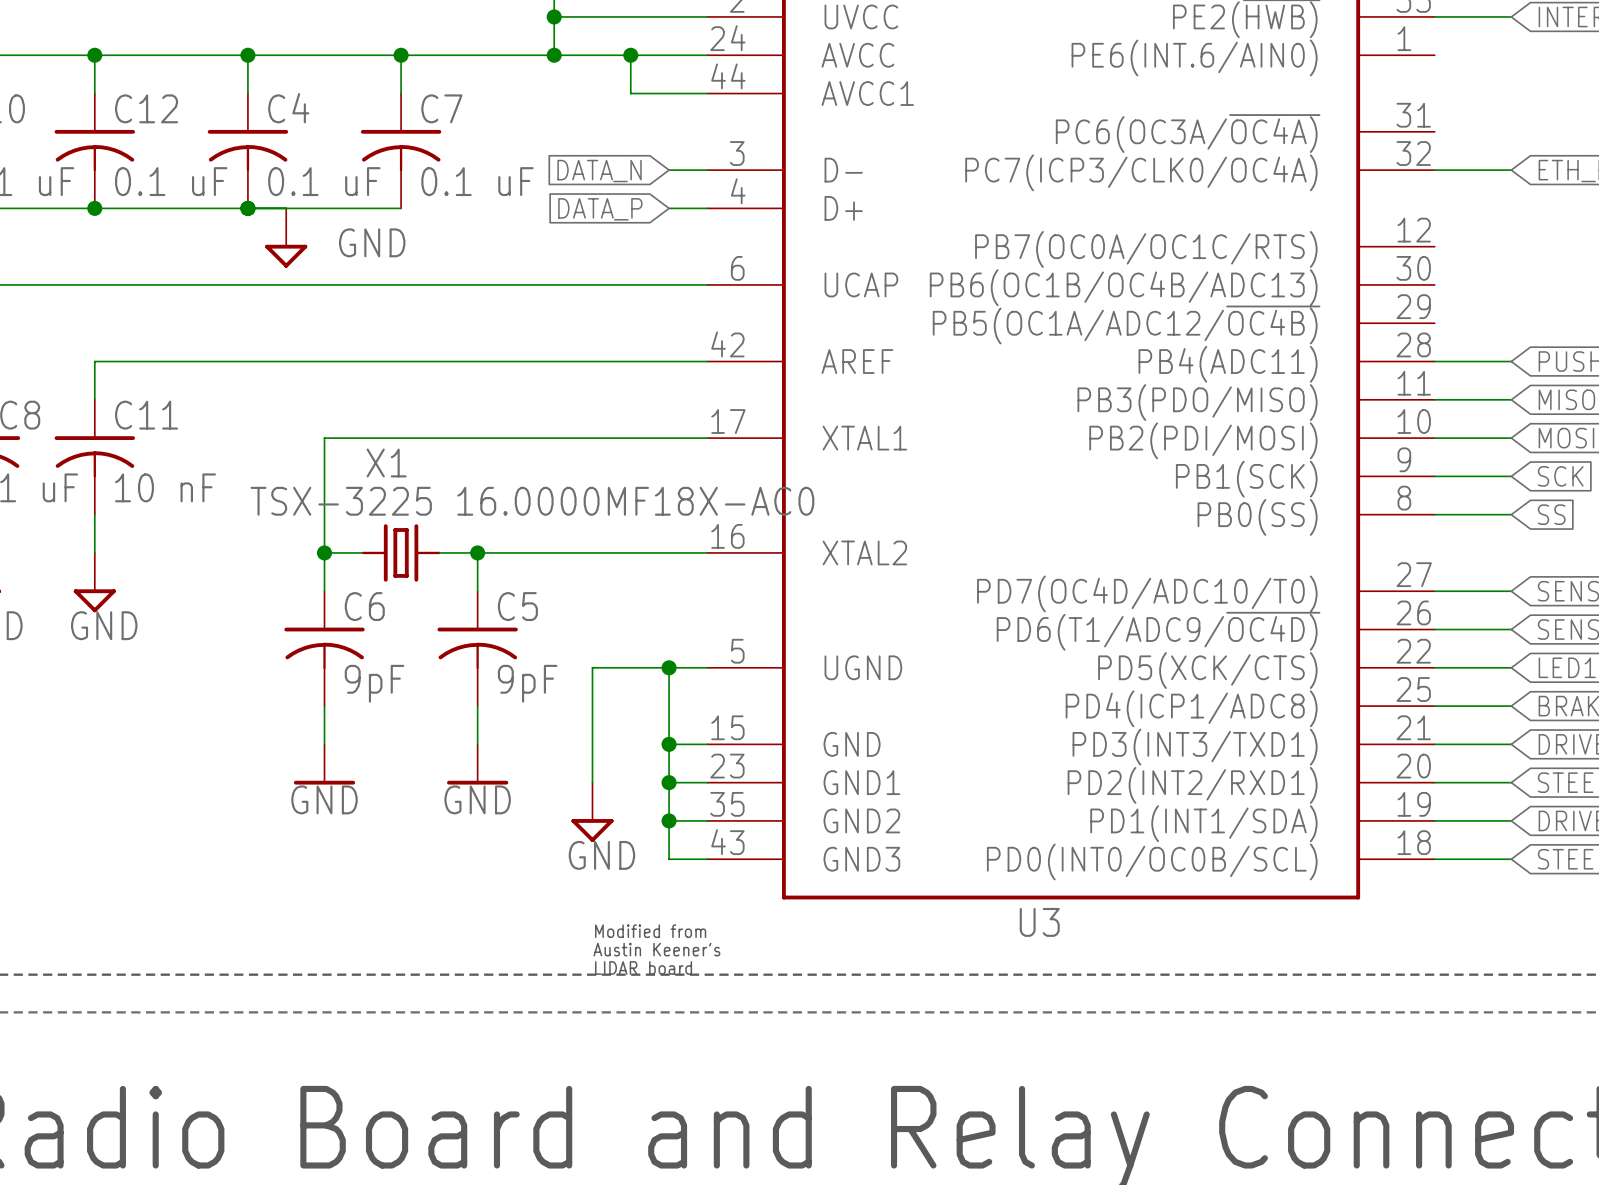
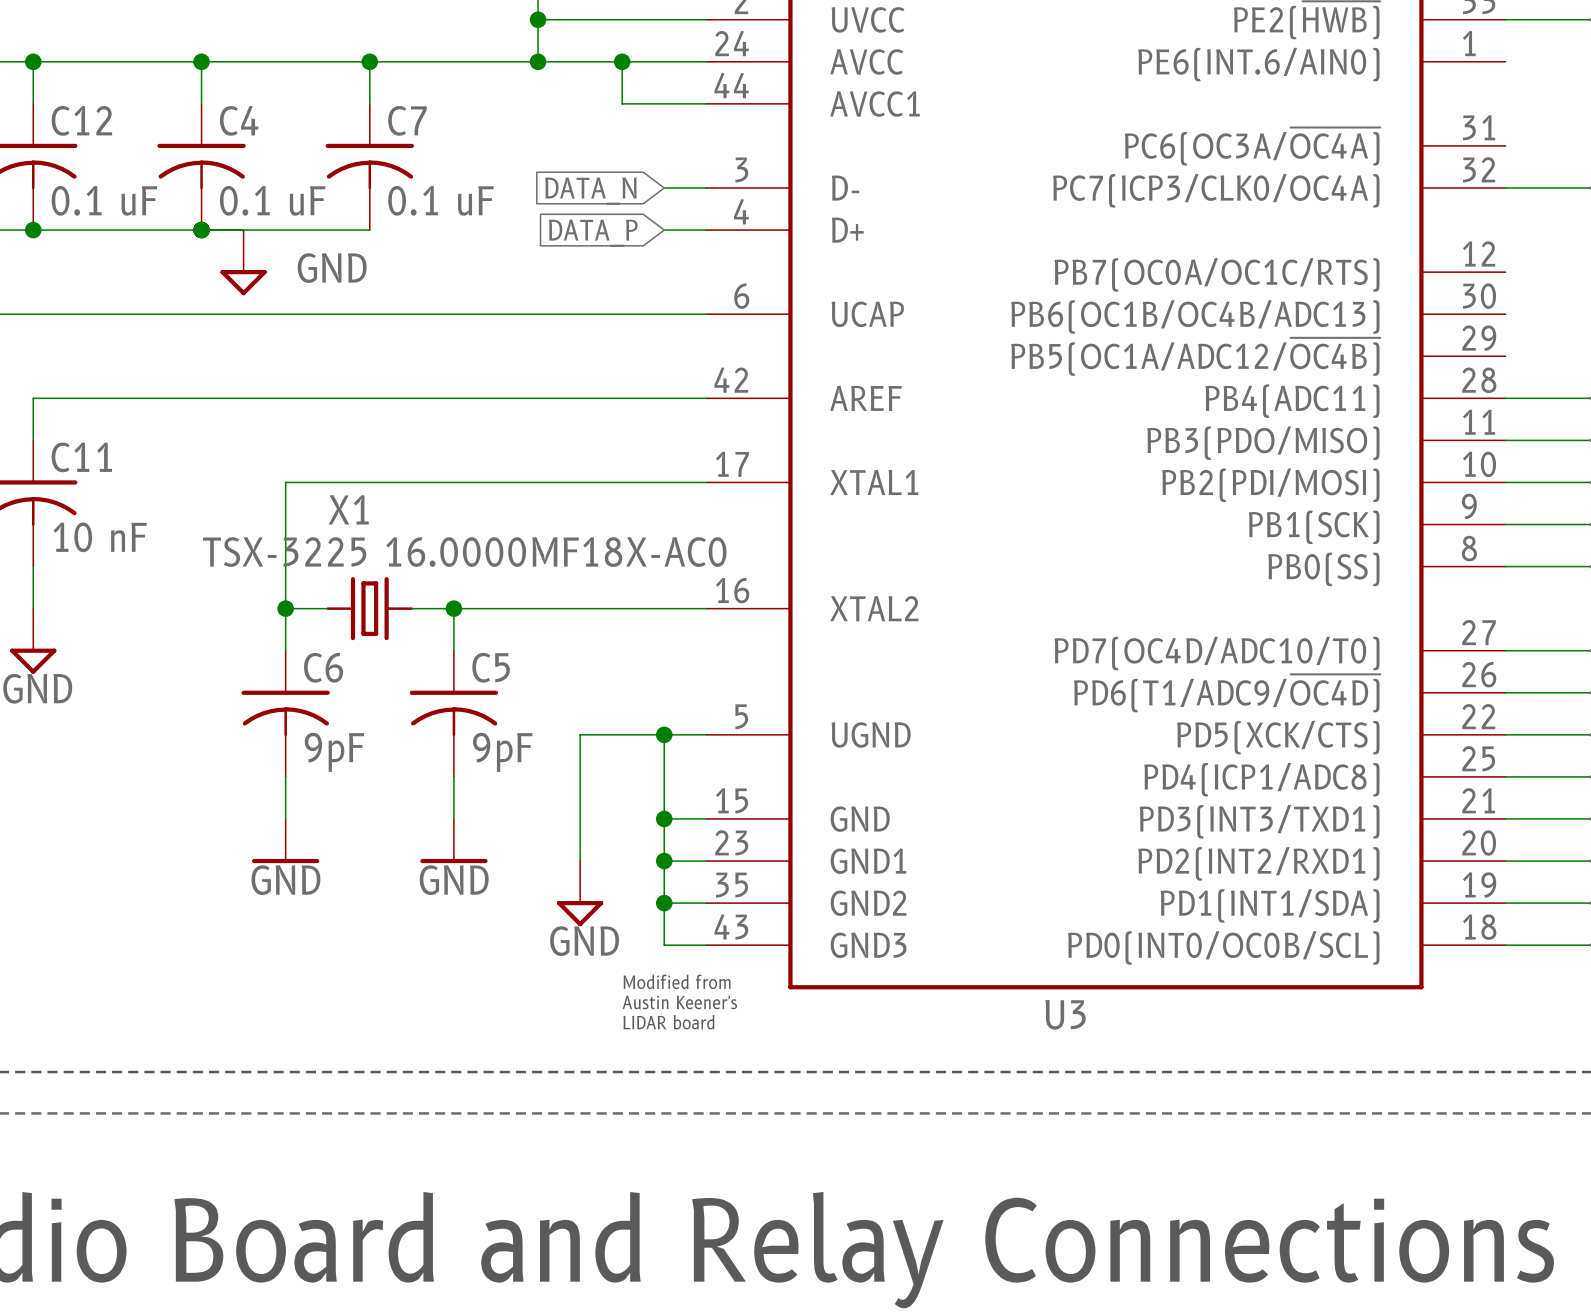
text position: Modified from (650, 931) -> Modified from (677, 981)
text position: Austin Keener's (656, 949) -> Austin Keener's (679, 1002)
text position: LIDAR board (643, 967) -> LIDAR board (668, 1022)

